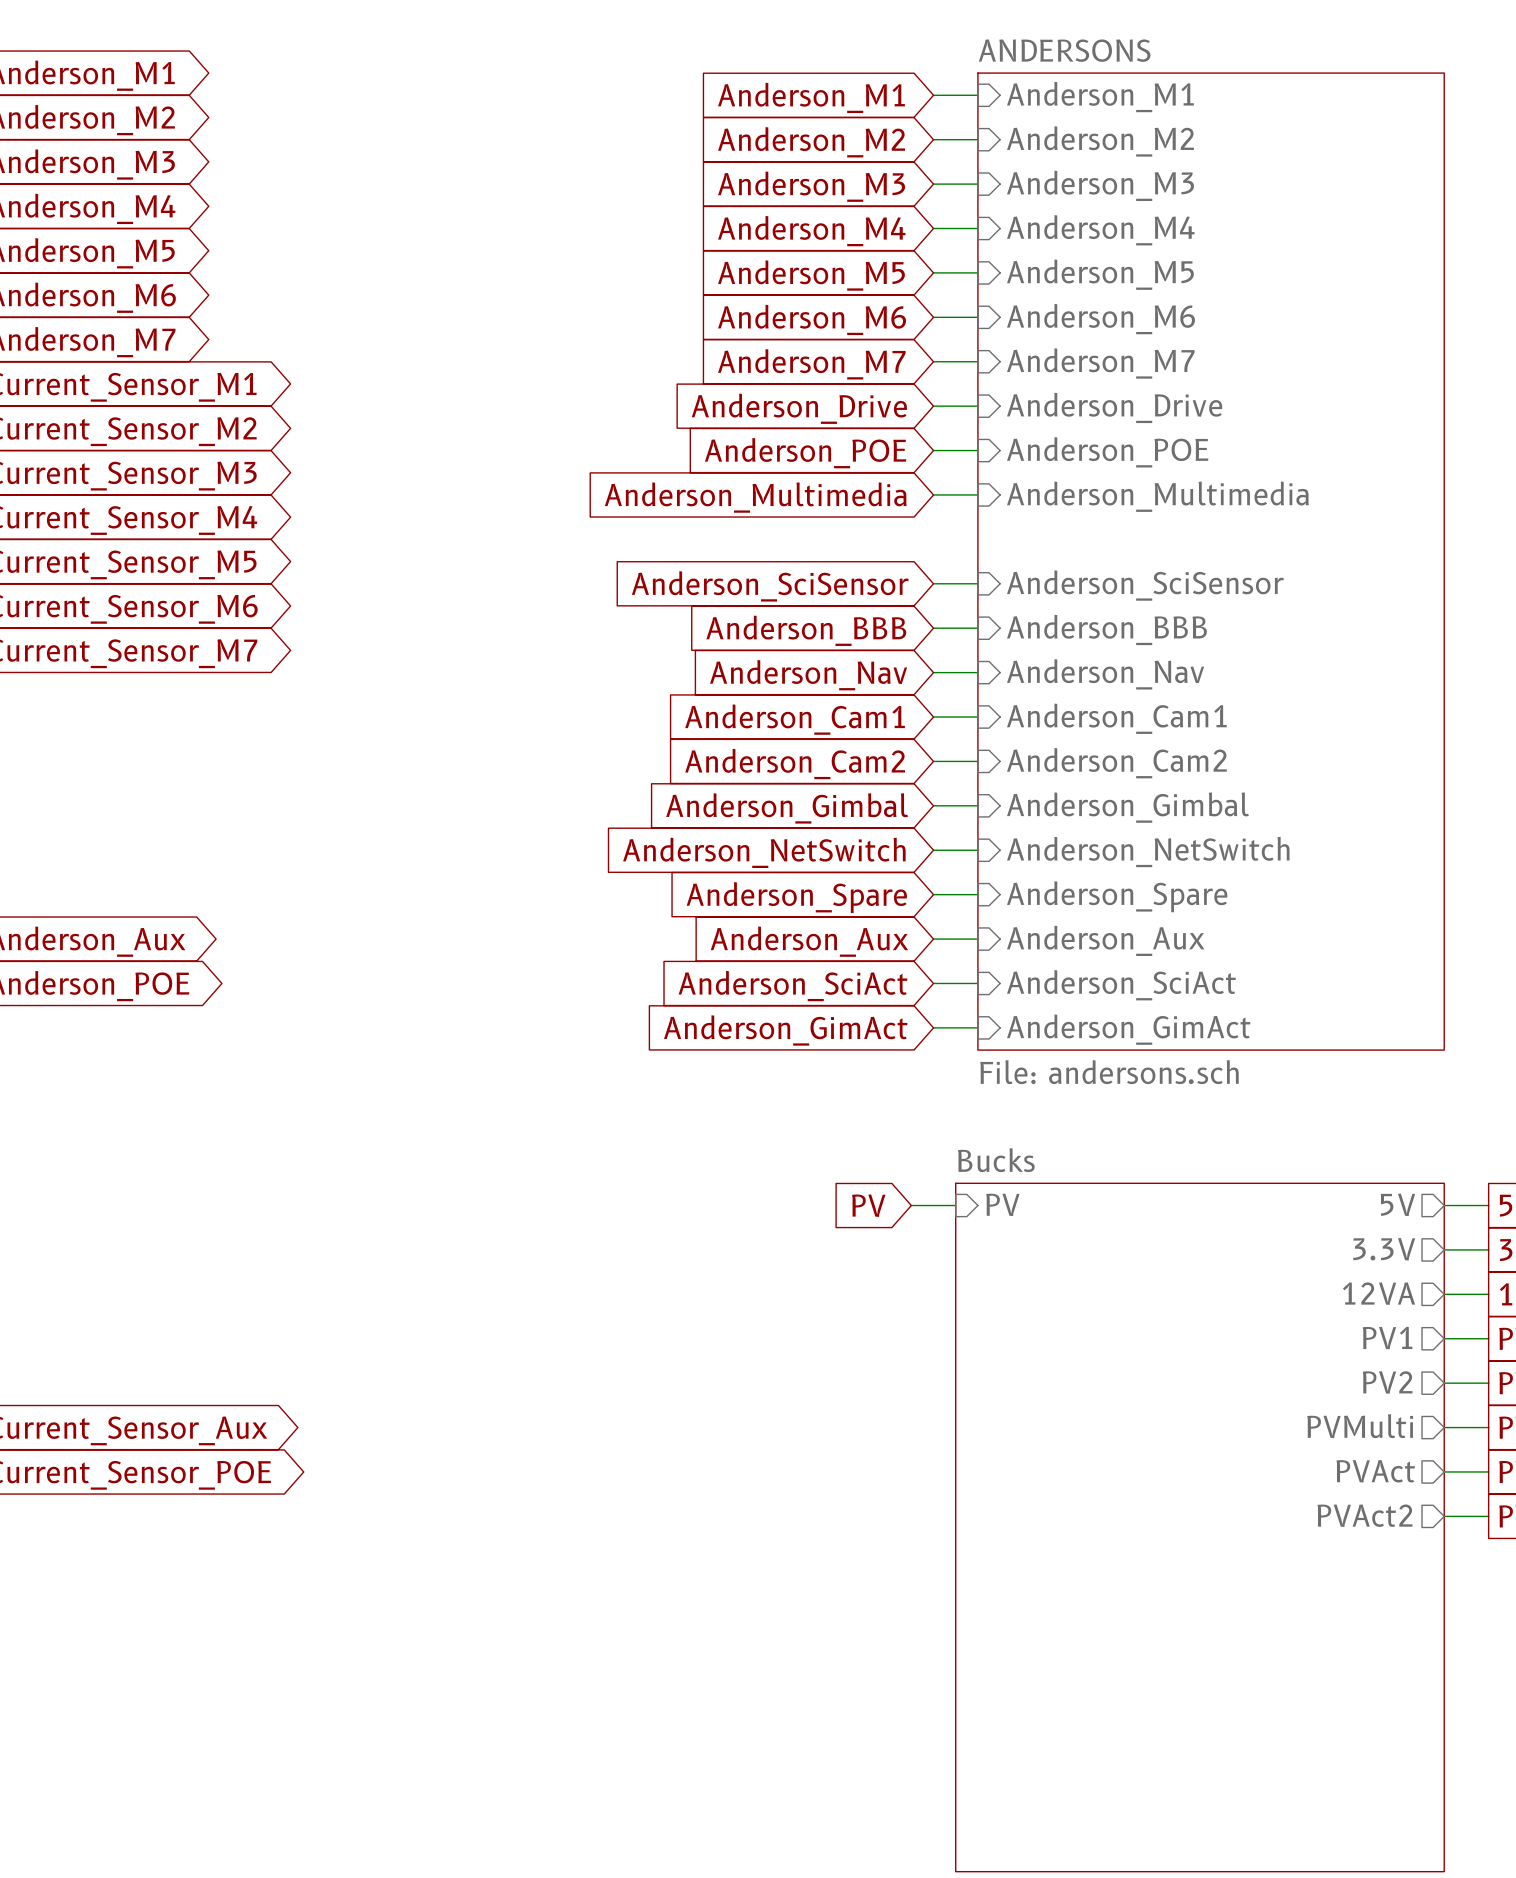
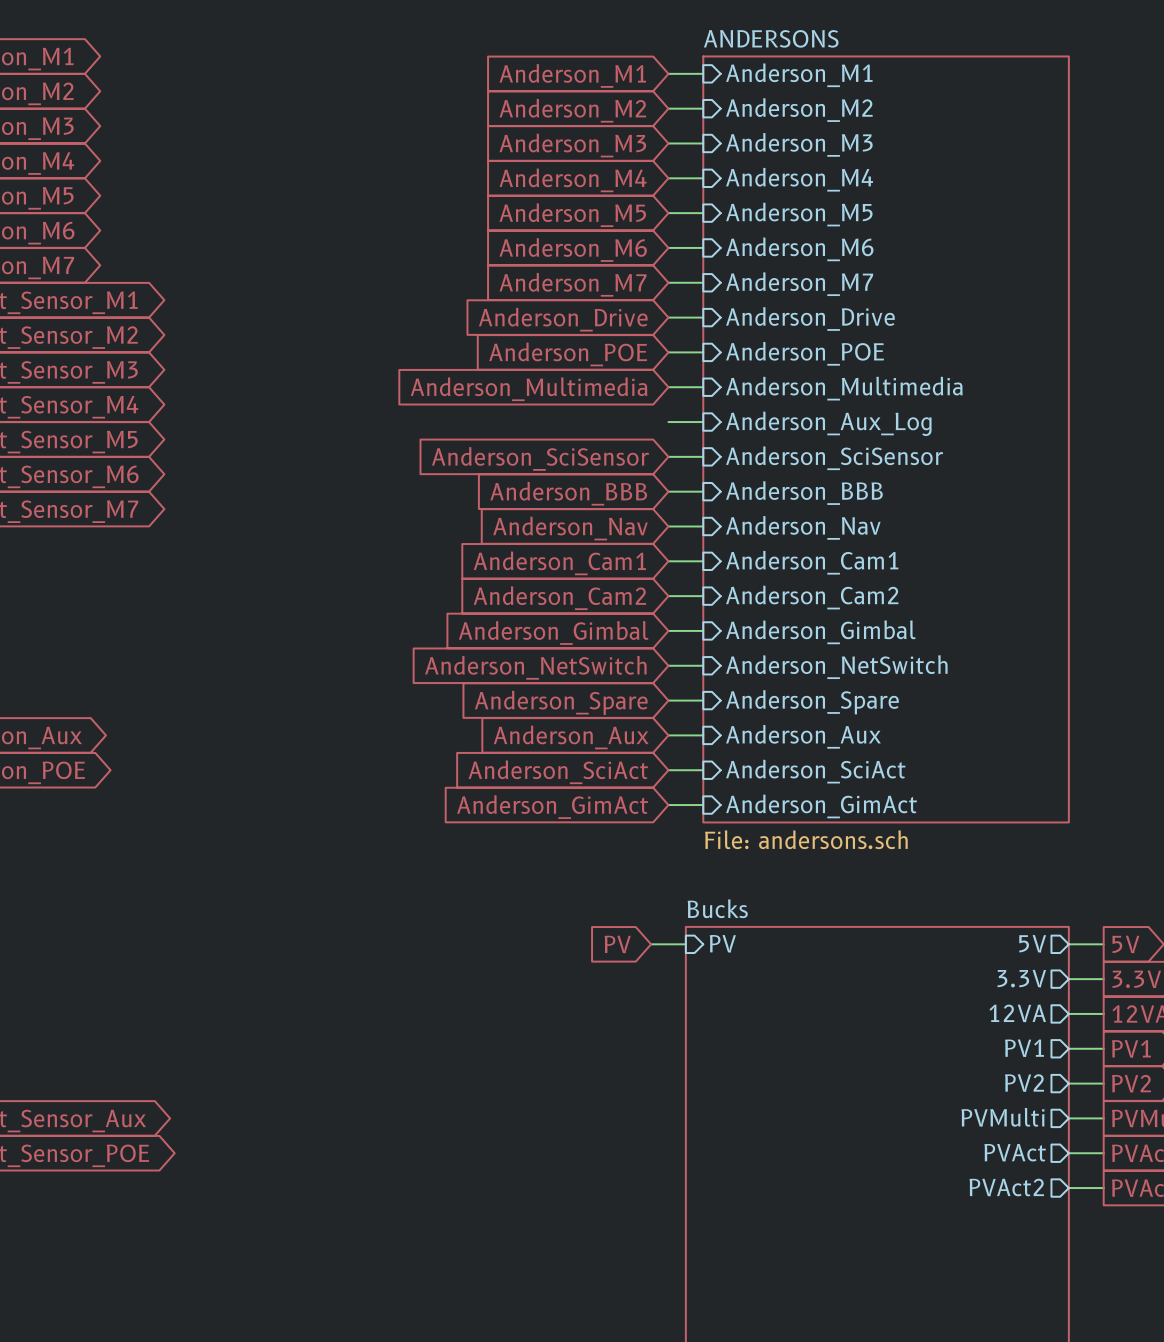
wire: none -> (668, 422) (703, 422)
sheet pin: none -> Anderson_Aux_Log (828, 423)

